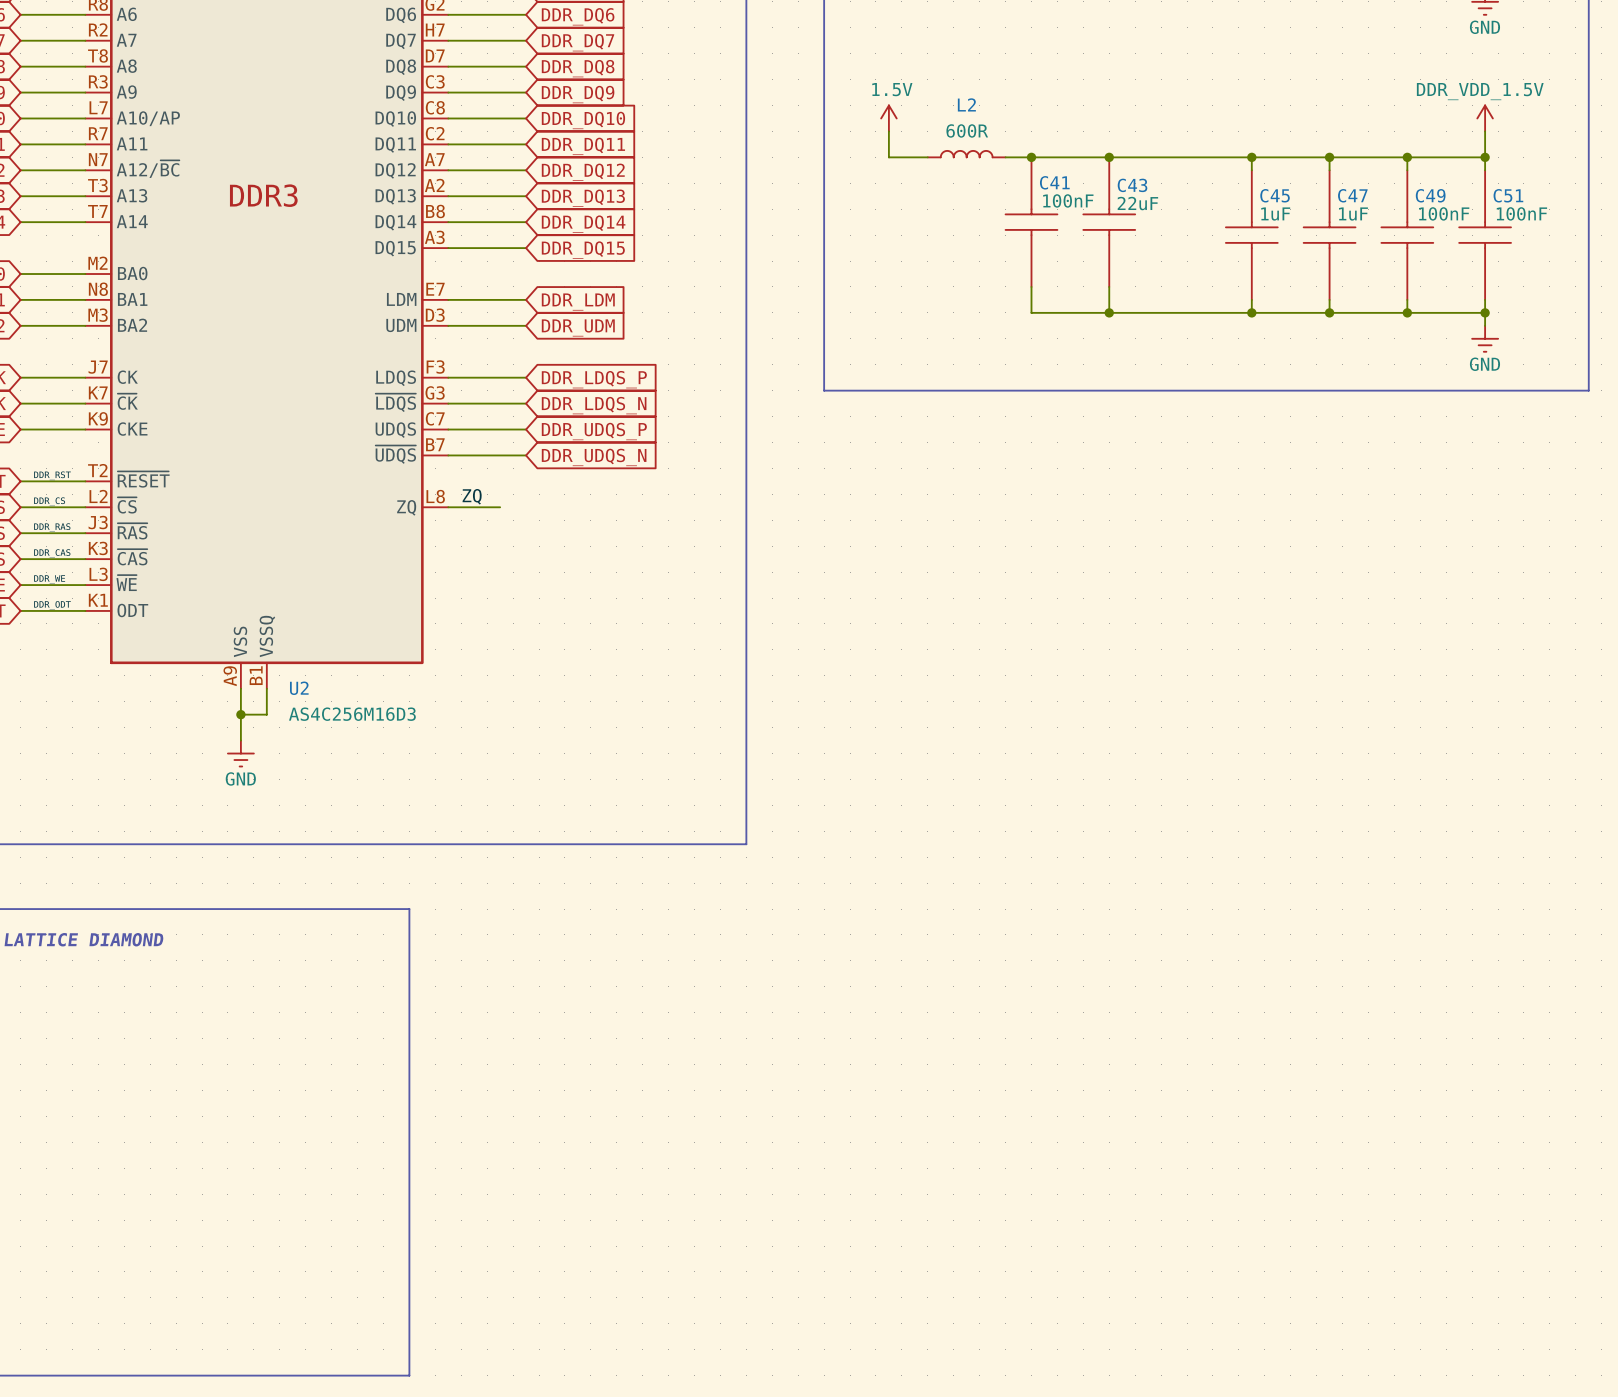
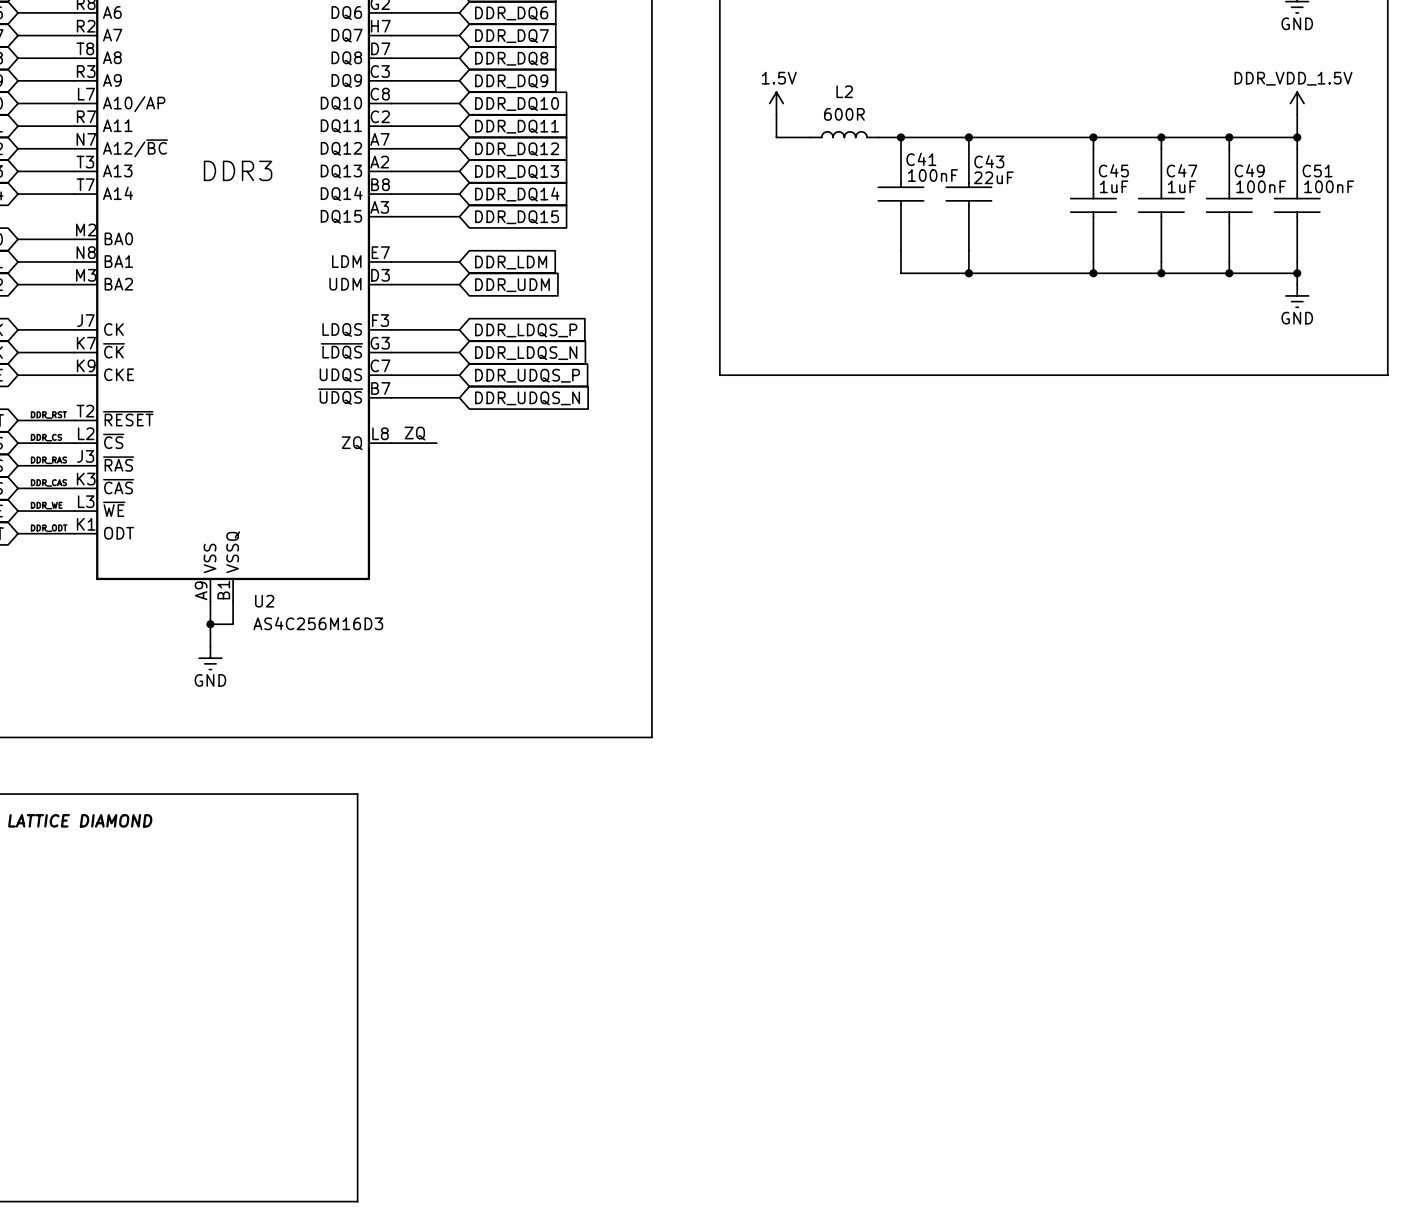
line: (824, 390) (1588, 390) -> (719, 341) (719, 375) (1387, 375) (1387, 341)

